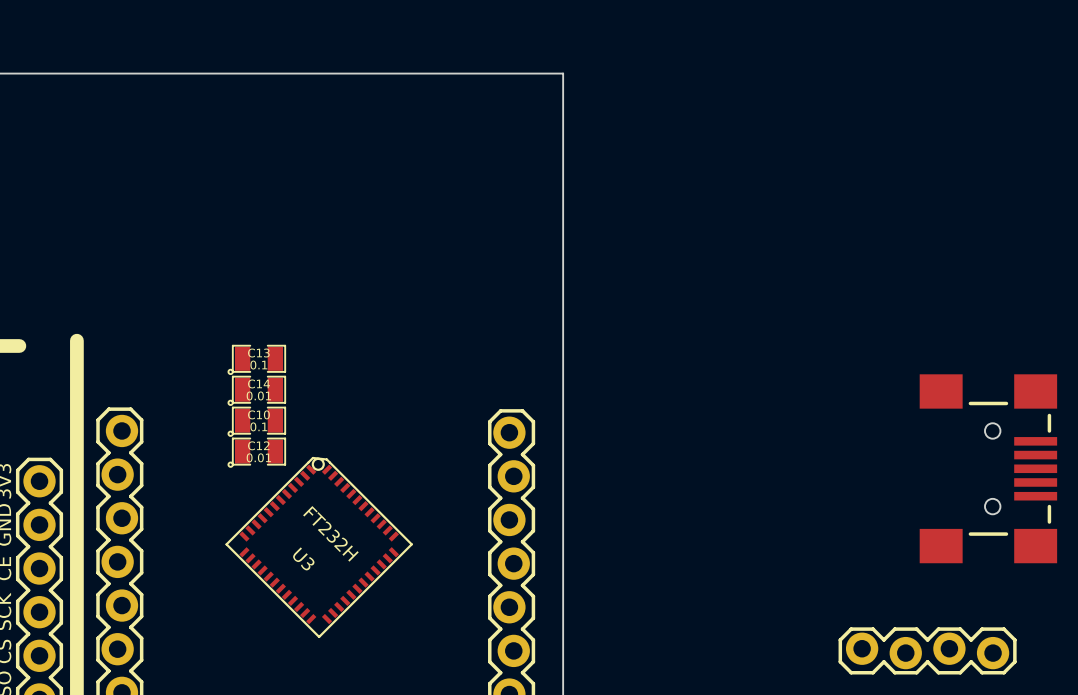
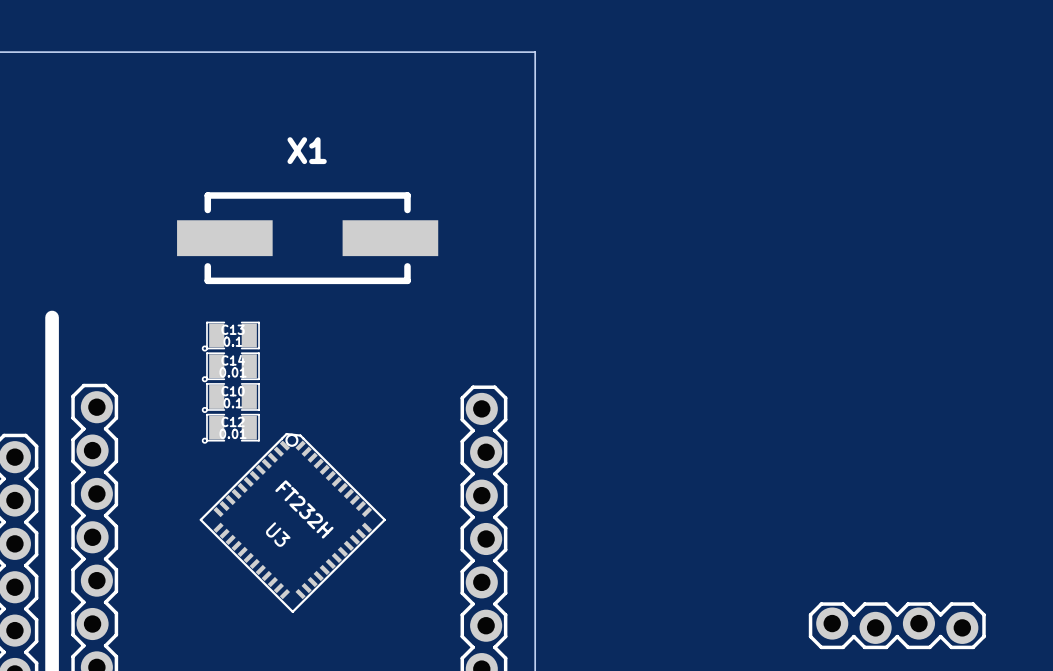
X1: none -> (307, 238)
part: (988, 468) -> none

